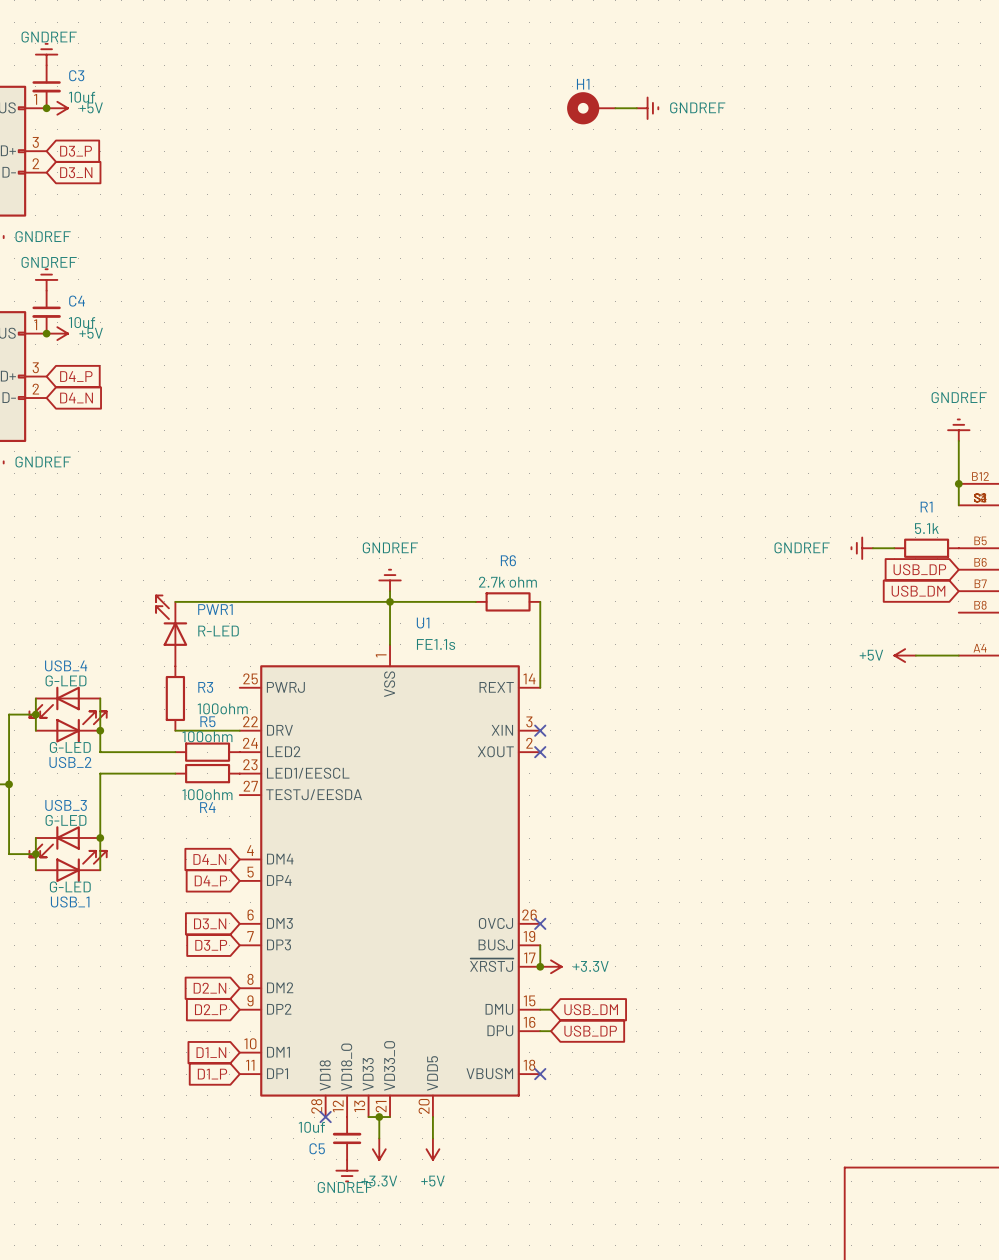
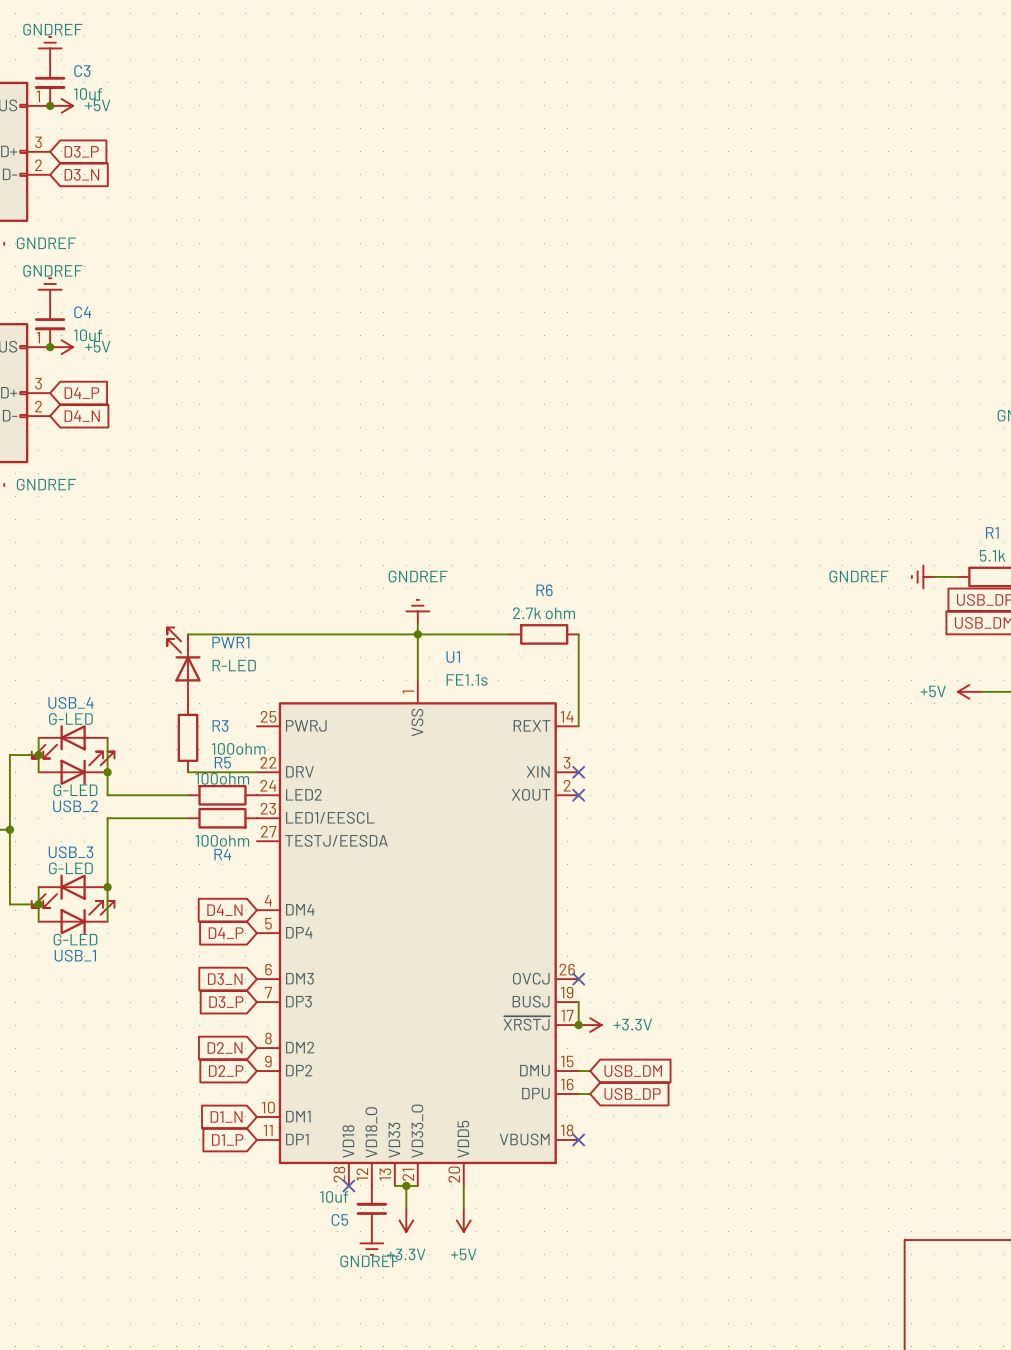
H1: (591, 108) -> none
wire: (615, 108) (636, 108) -> none
power symbol: GNDREF (647, 108) -> none

